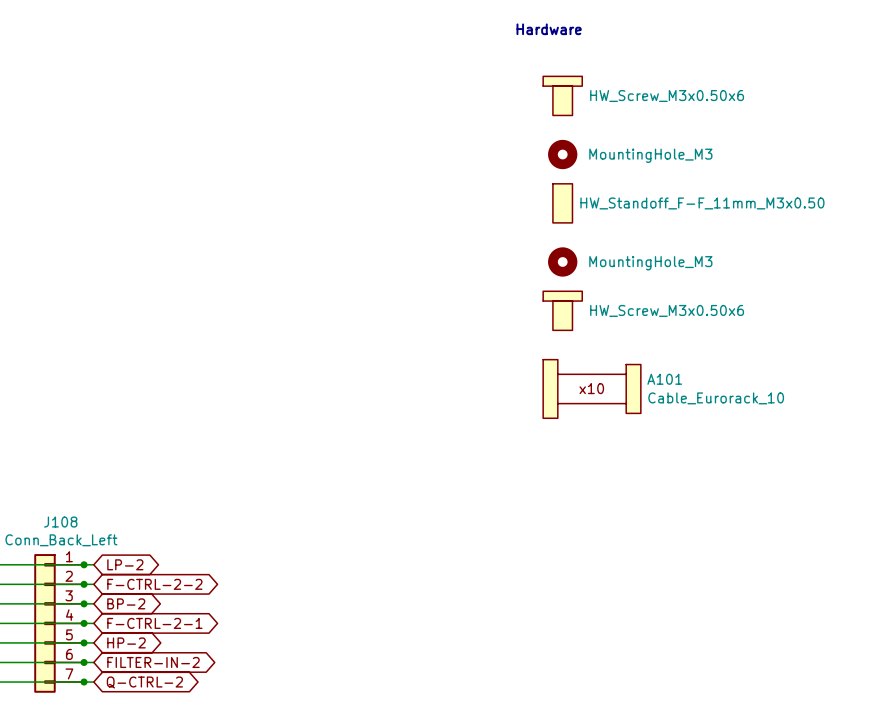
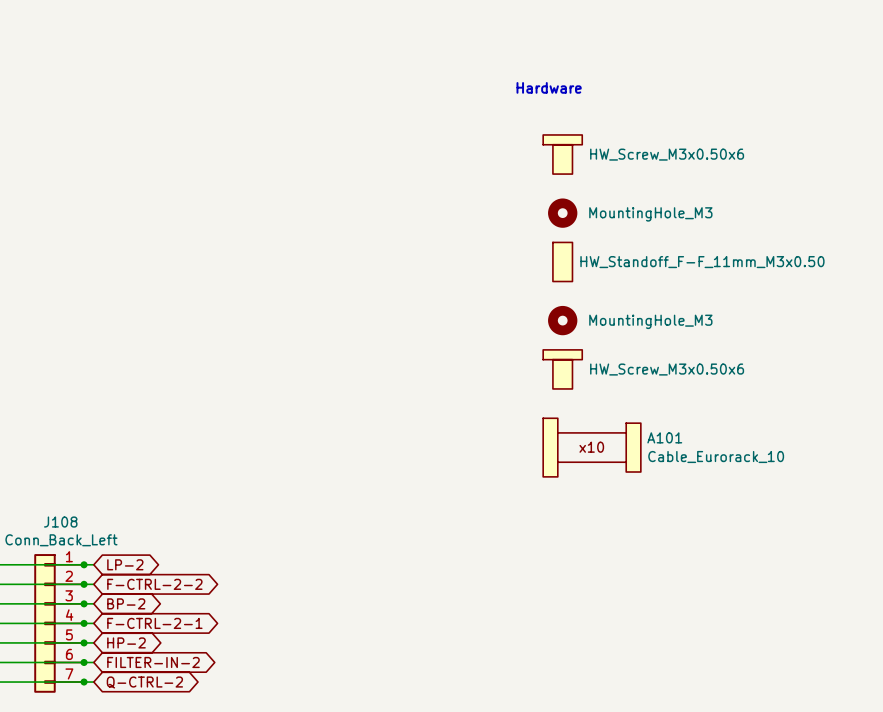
text position: Hardware (549, 29) -> Hardware (549, 87)
part: HW_Screw_M3x0.50x6 (562, 95) -> none
part symbol: [548, 139, 578, 170] -> [543, 134, 583, 175]
part value: MountingHole_M3 (650, 155) -> HW_Screw_M3x0.50x6 (667, 154)
part: HW_Standoff_F-F_11mm_M3x0.50 (562, 203) -> none
part: none -> MountingHole_M3 (562, 213)
part symbol: [548, 247, 578, 277] -> [552, 242, 573, 282]
part value: MountingHole_M3 (650, 263) -> HW_Standoff_F-F_11mm_M3x0.50 (702, 262)
part position: (562, 310) -> (562, 369)
part: none -> MountingHole_M3 (562, 320)
A101 position: (592, 388) -> (592, 447)

